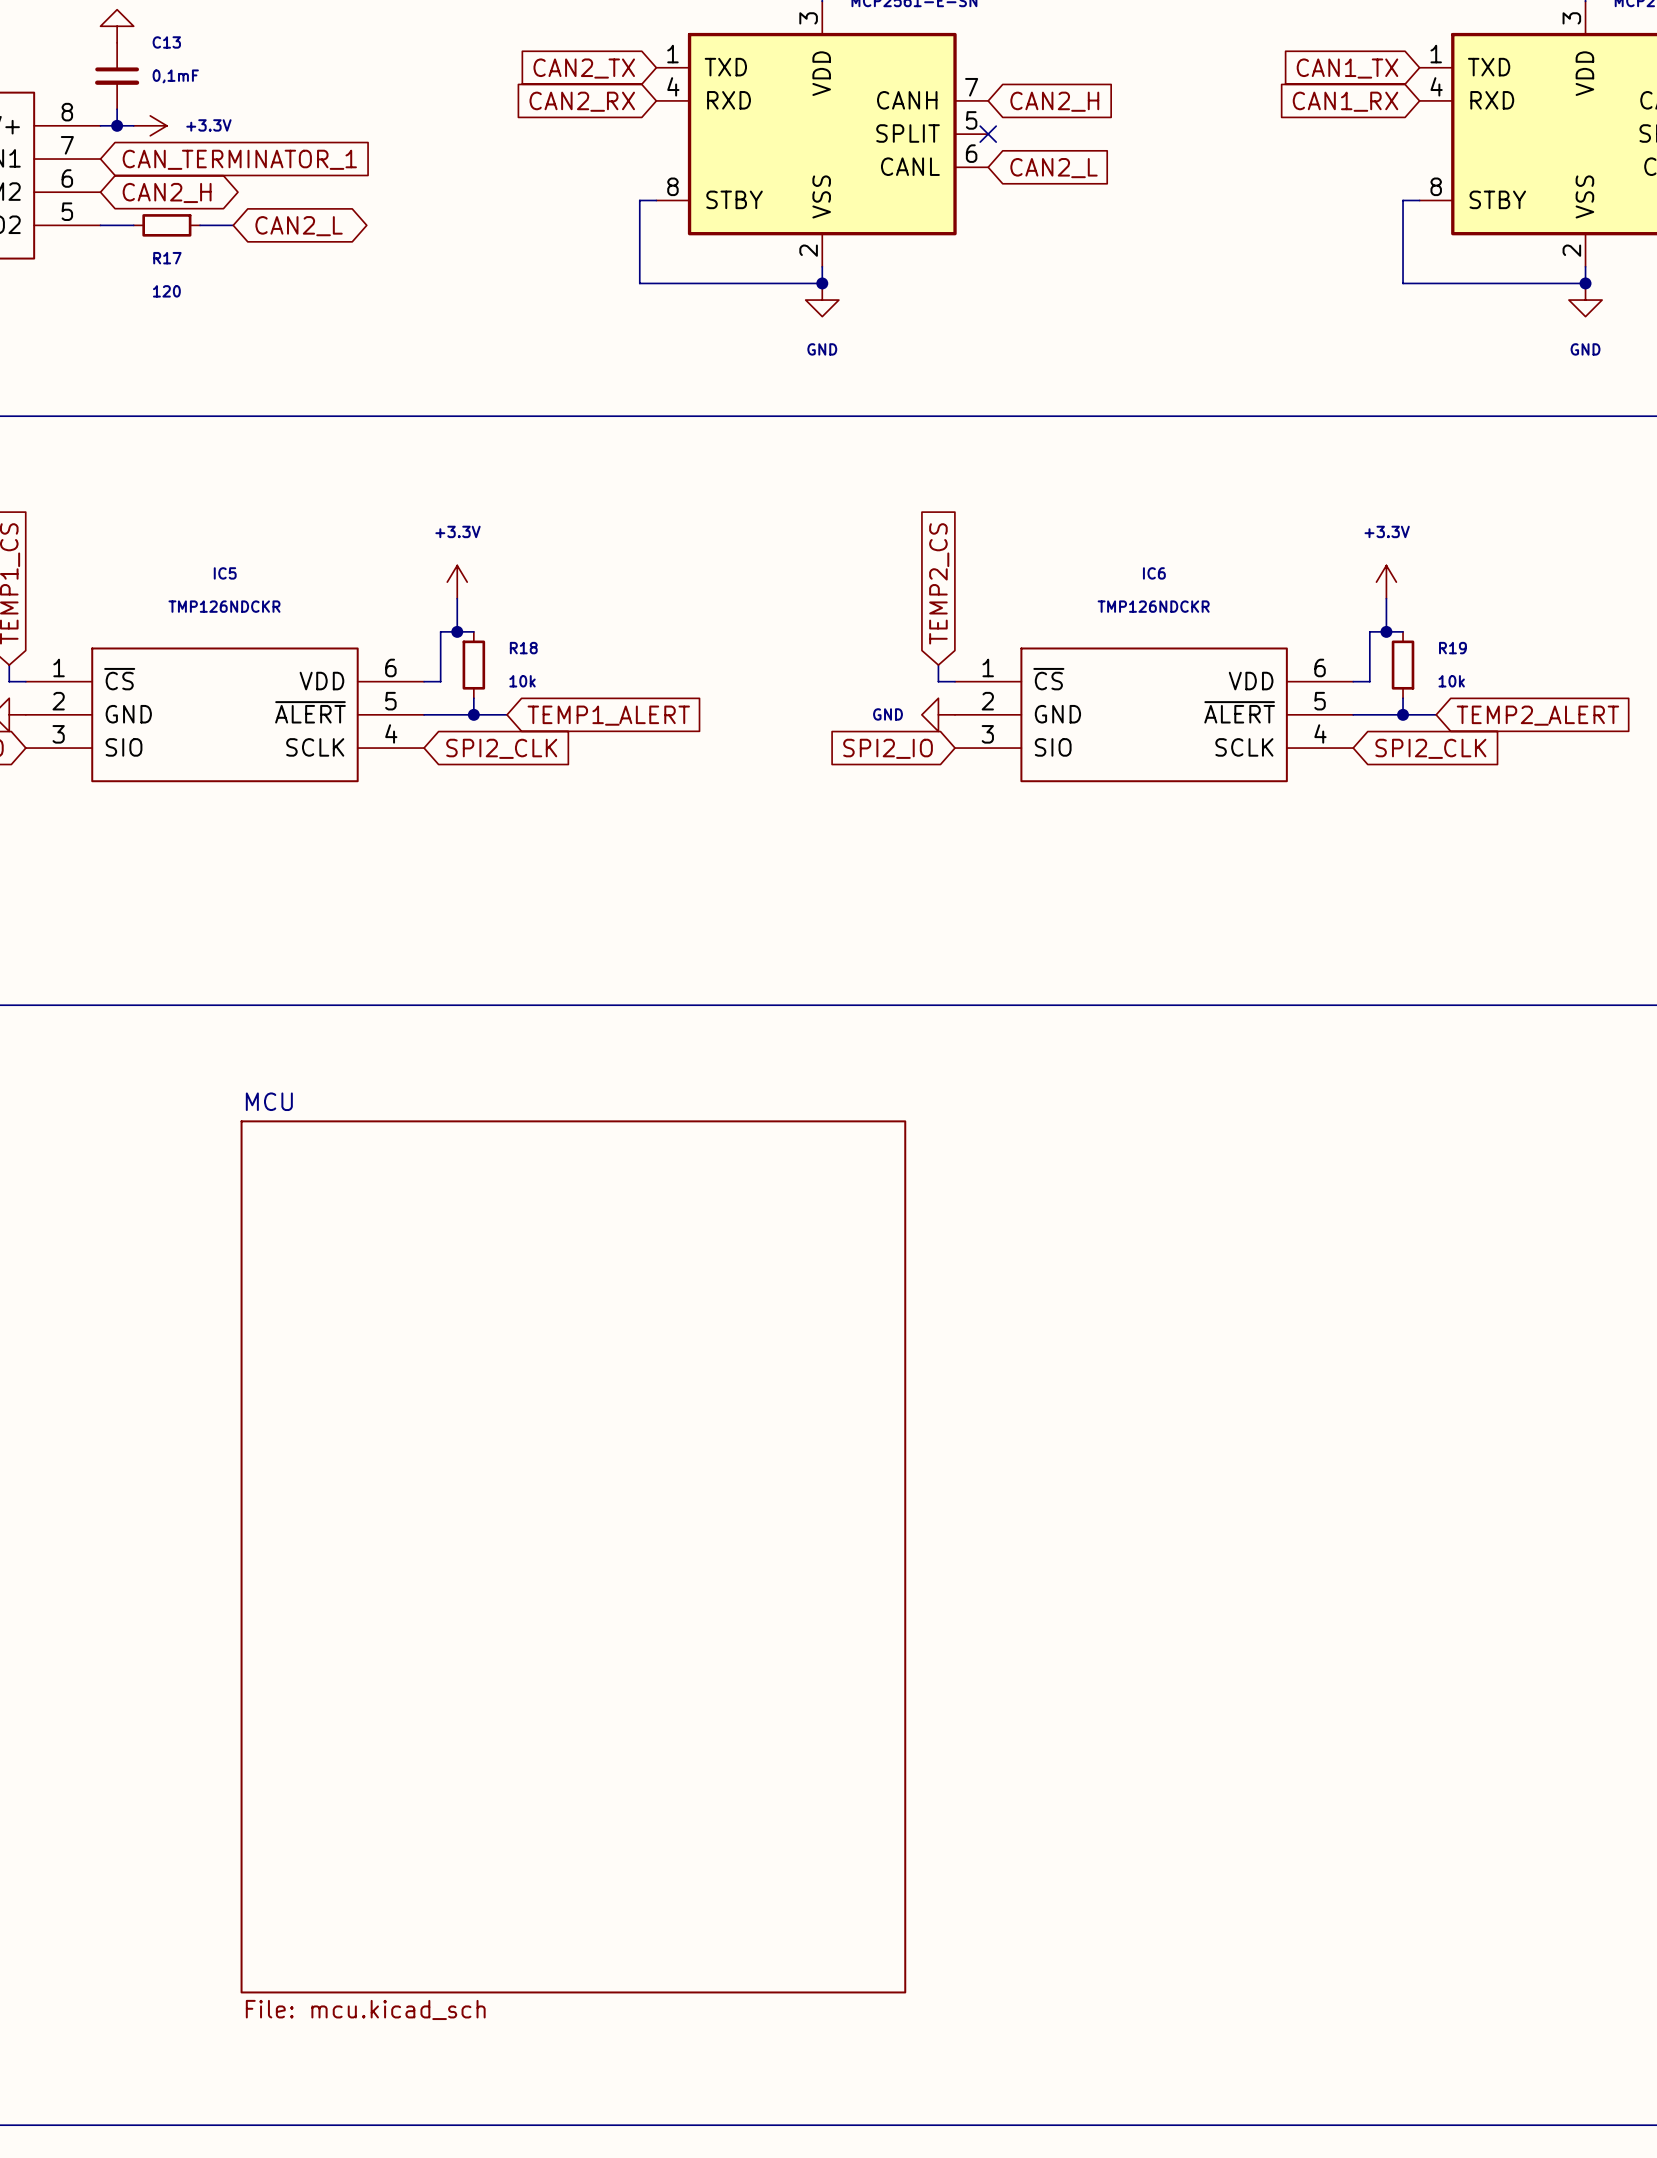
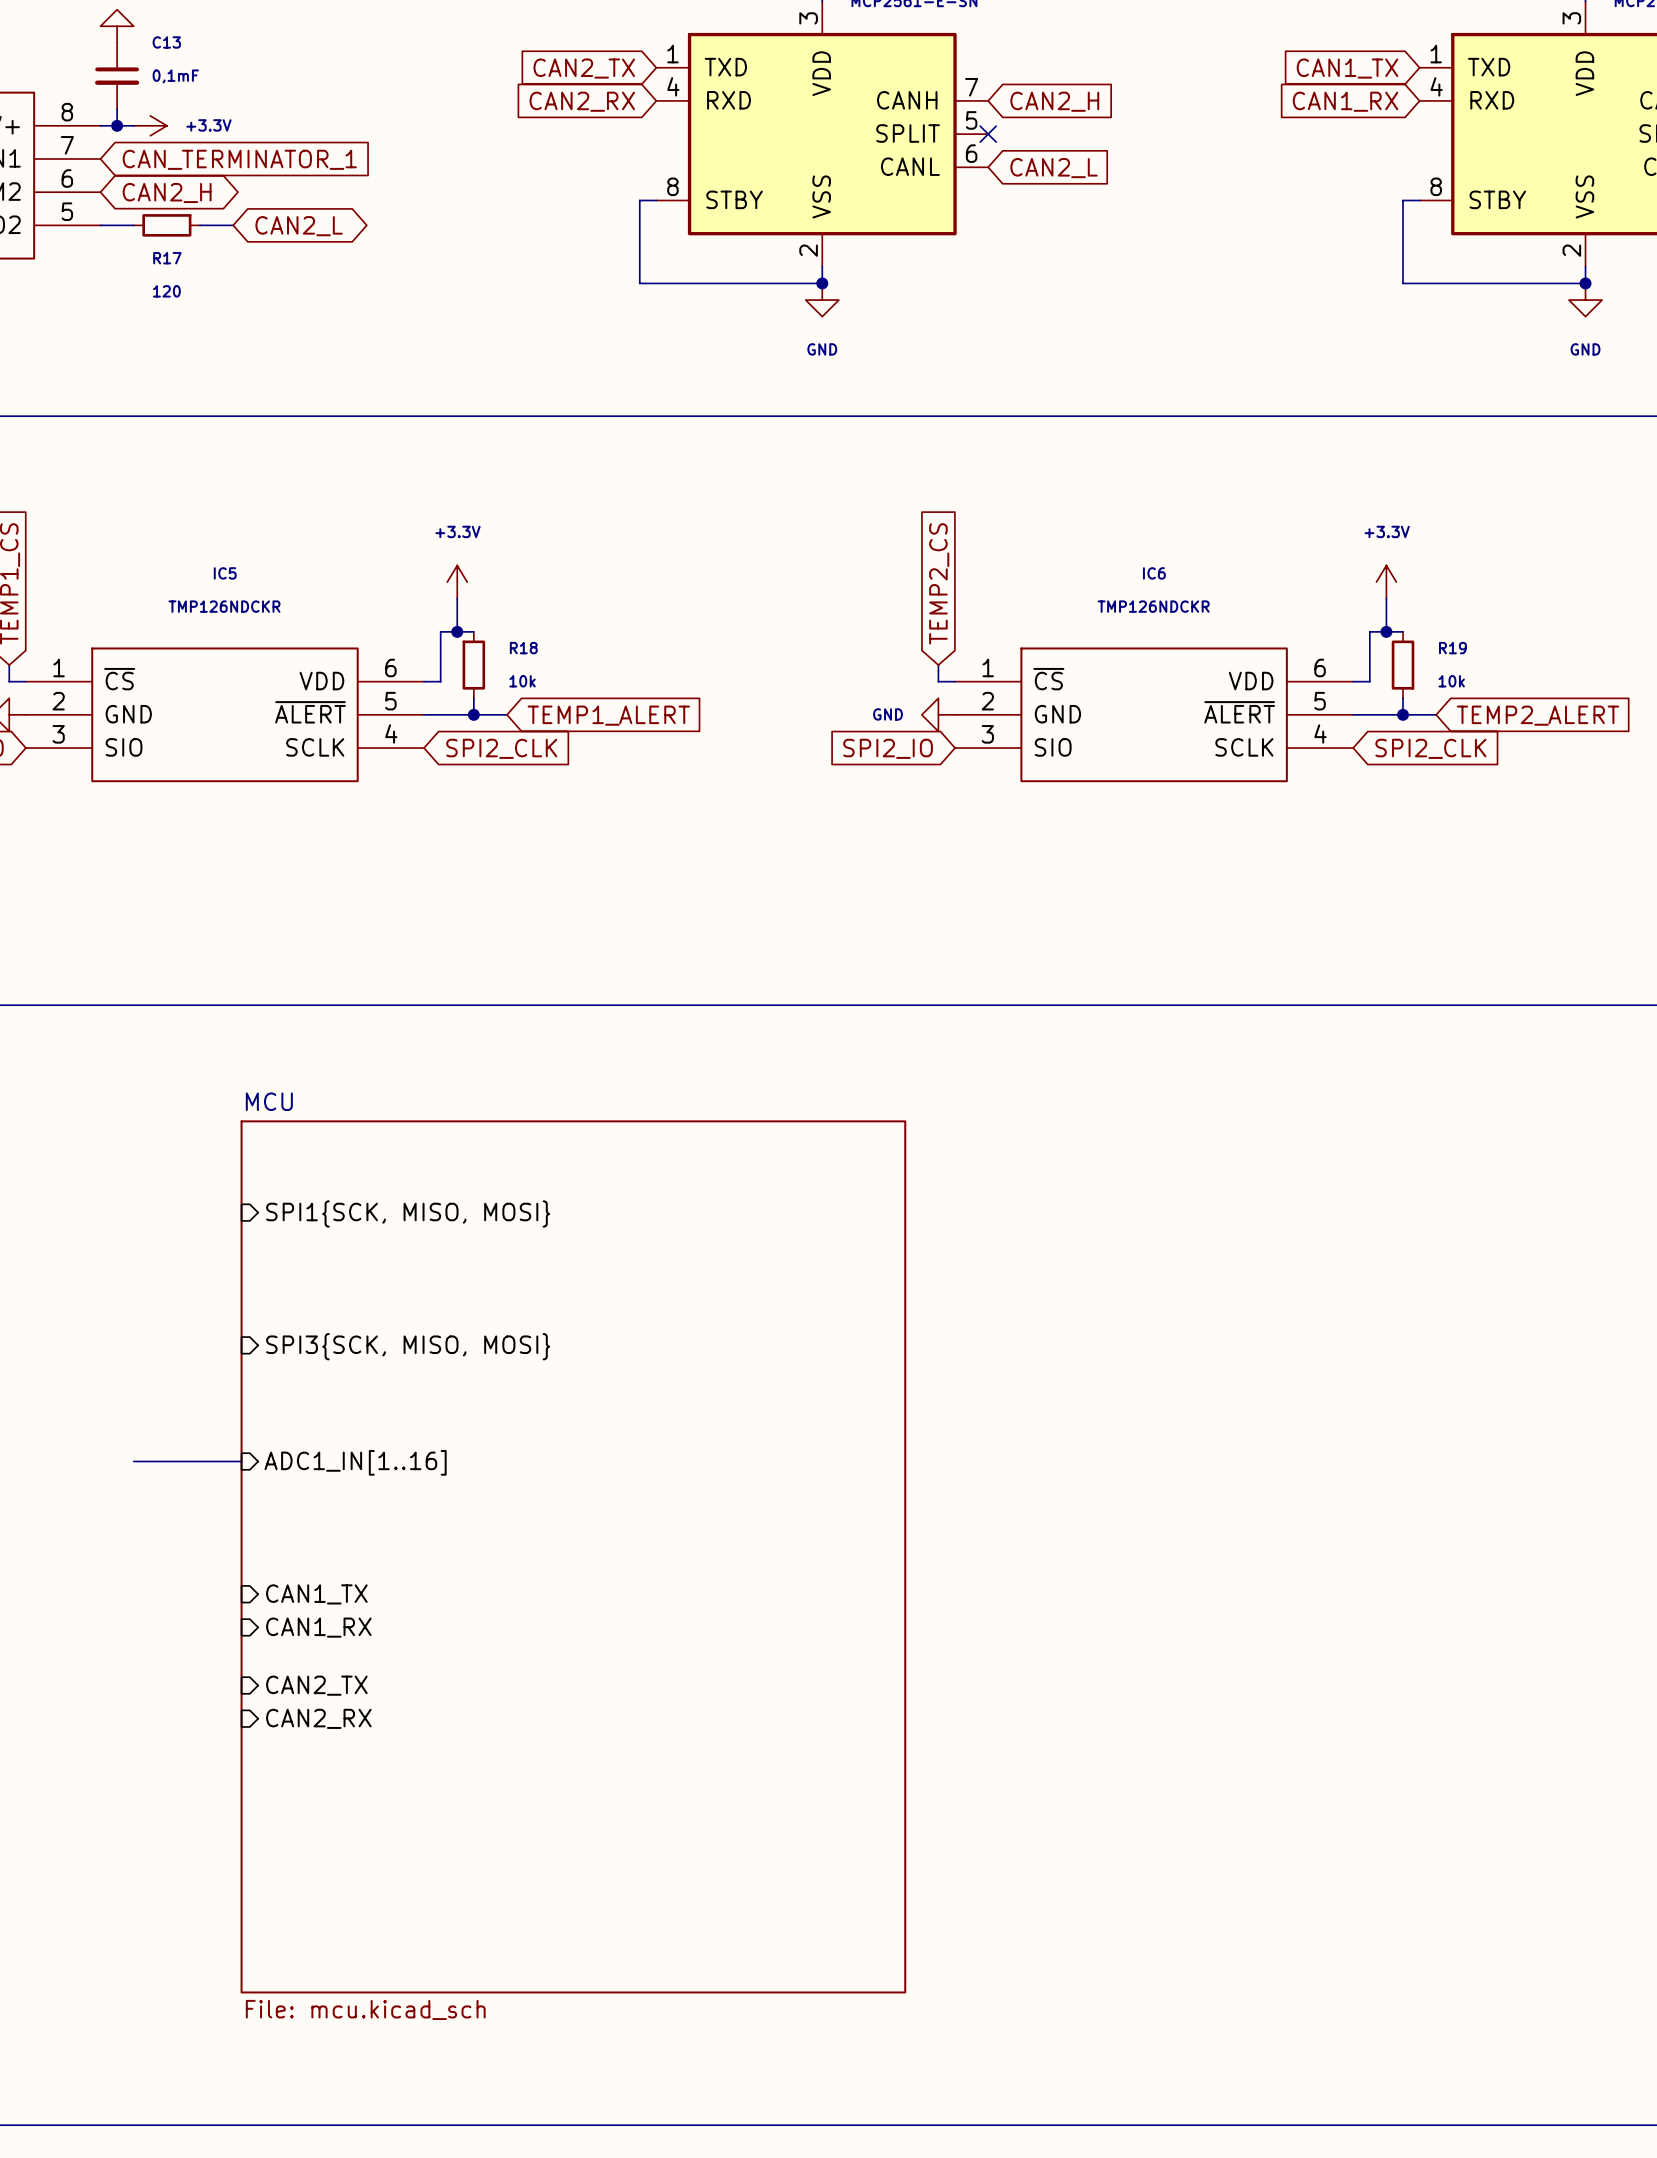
sheet pin: none -> SPI1{SCK, MISO, MOSI} (408, 1213)
sheet pin: none -> SPI3{SCK, MISO, MOSI} (408, 1346)
bus: none -> (133, 1461) (241, 1461)
sheet pin: none -> ADC1_IN[1..16] (355, 1462)
sheet pin: none -> CAN1_TX (316, 1594)
sheet pin: none -> CAN1_RX (318, 1627)
sheet pin: none -> CAN2_TX (316, 1685)
sheet pin: none -> CAN2_RX (318, 1718)

